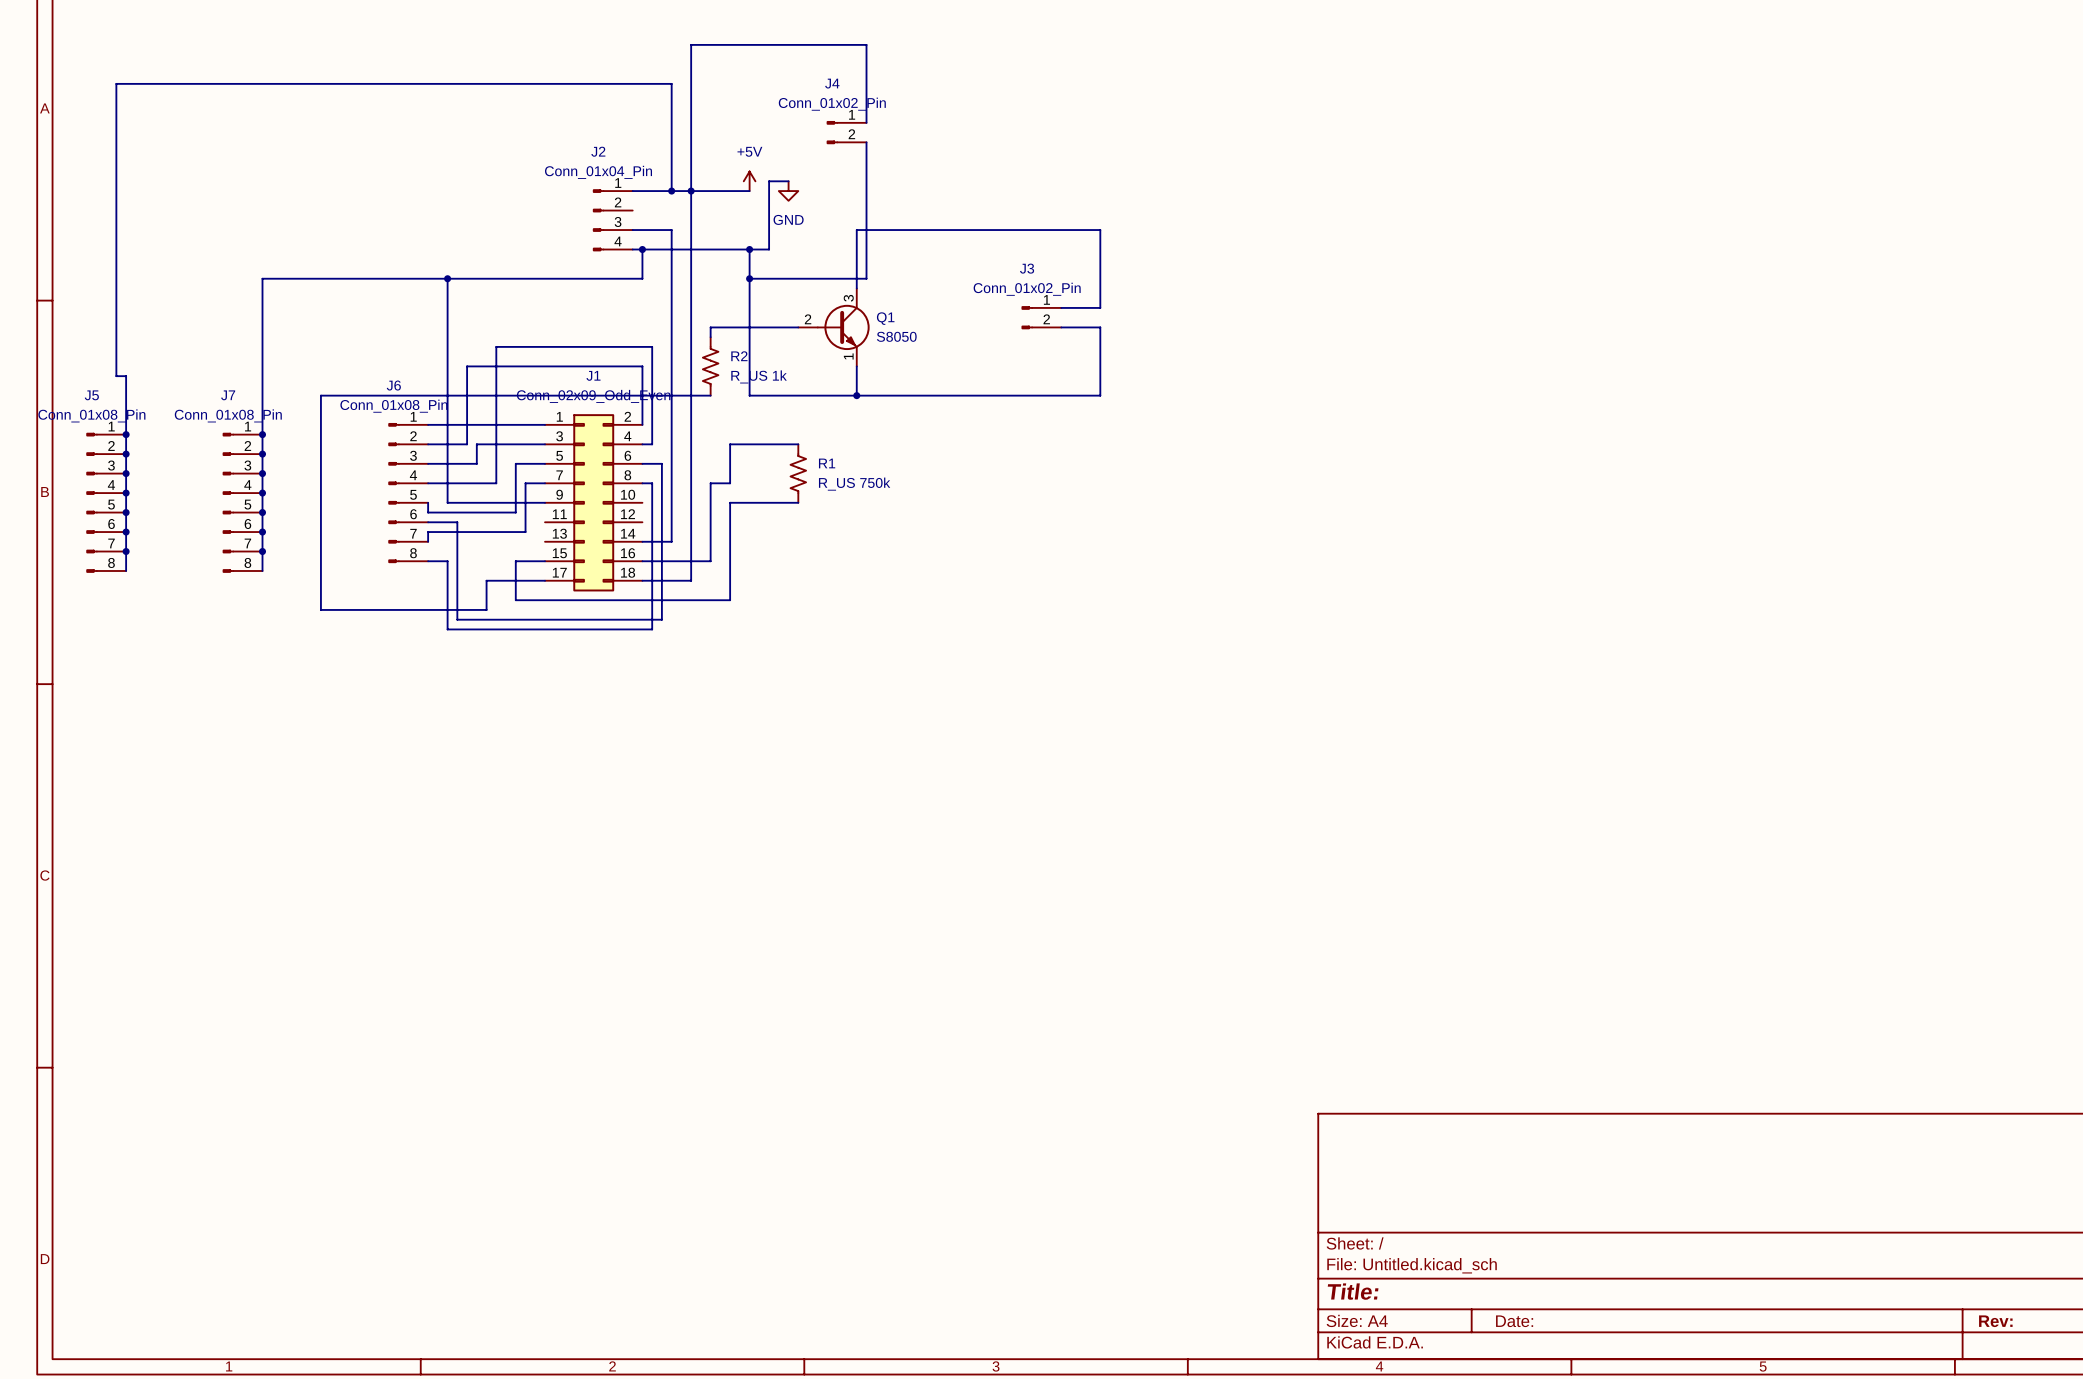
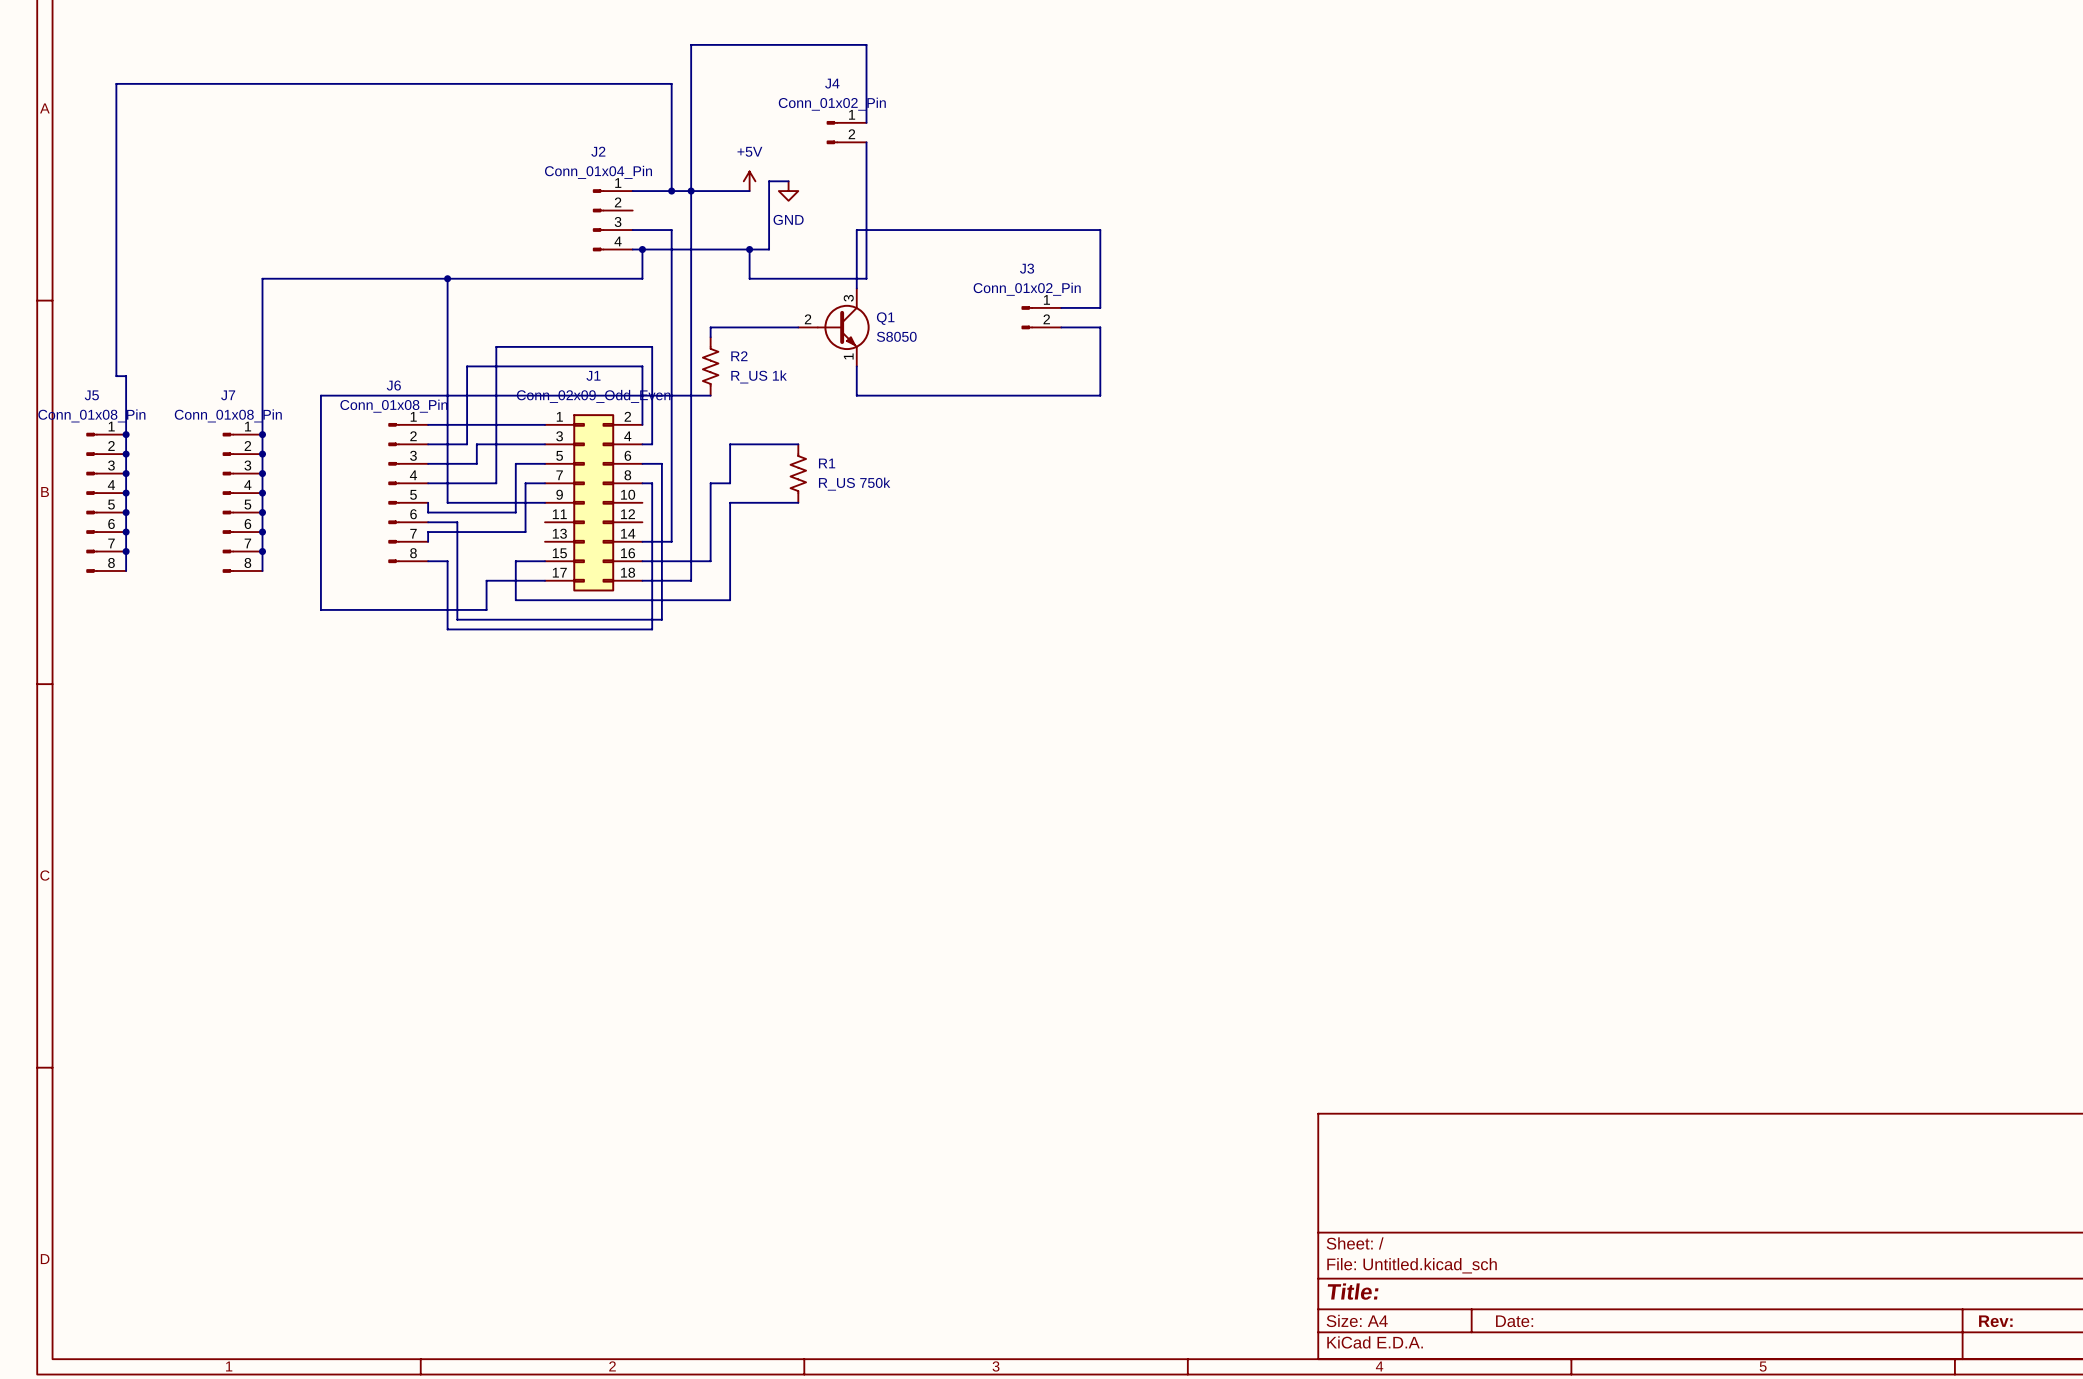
wire: (749, 278) (749, 395) (856, 395) -> none
junction: (749, 278) -> none
junction: (856, 395) -> none

